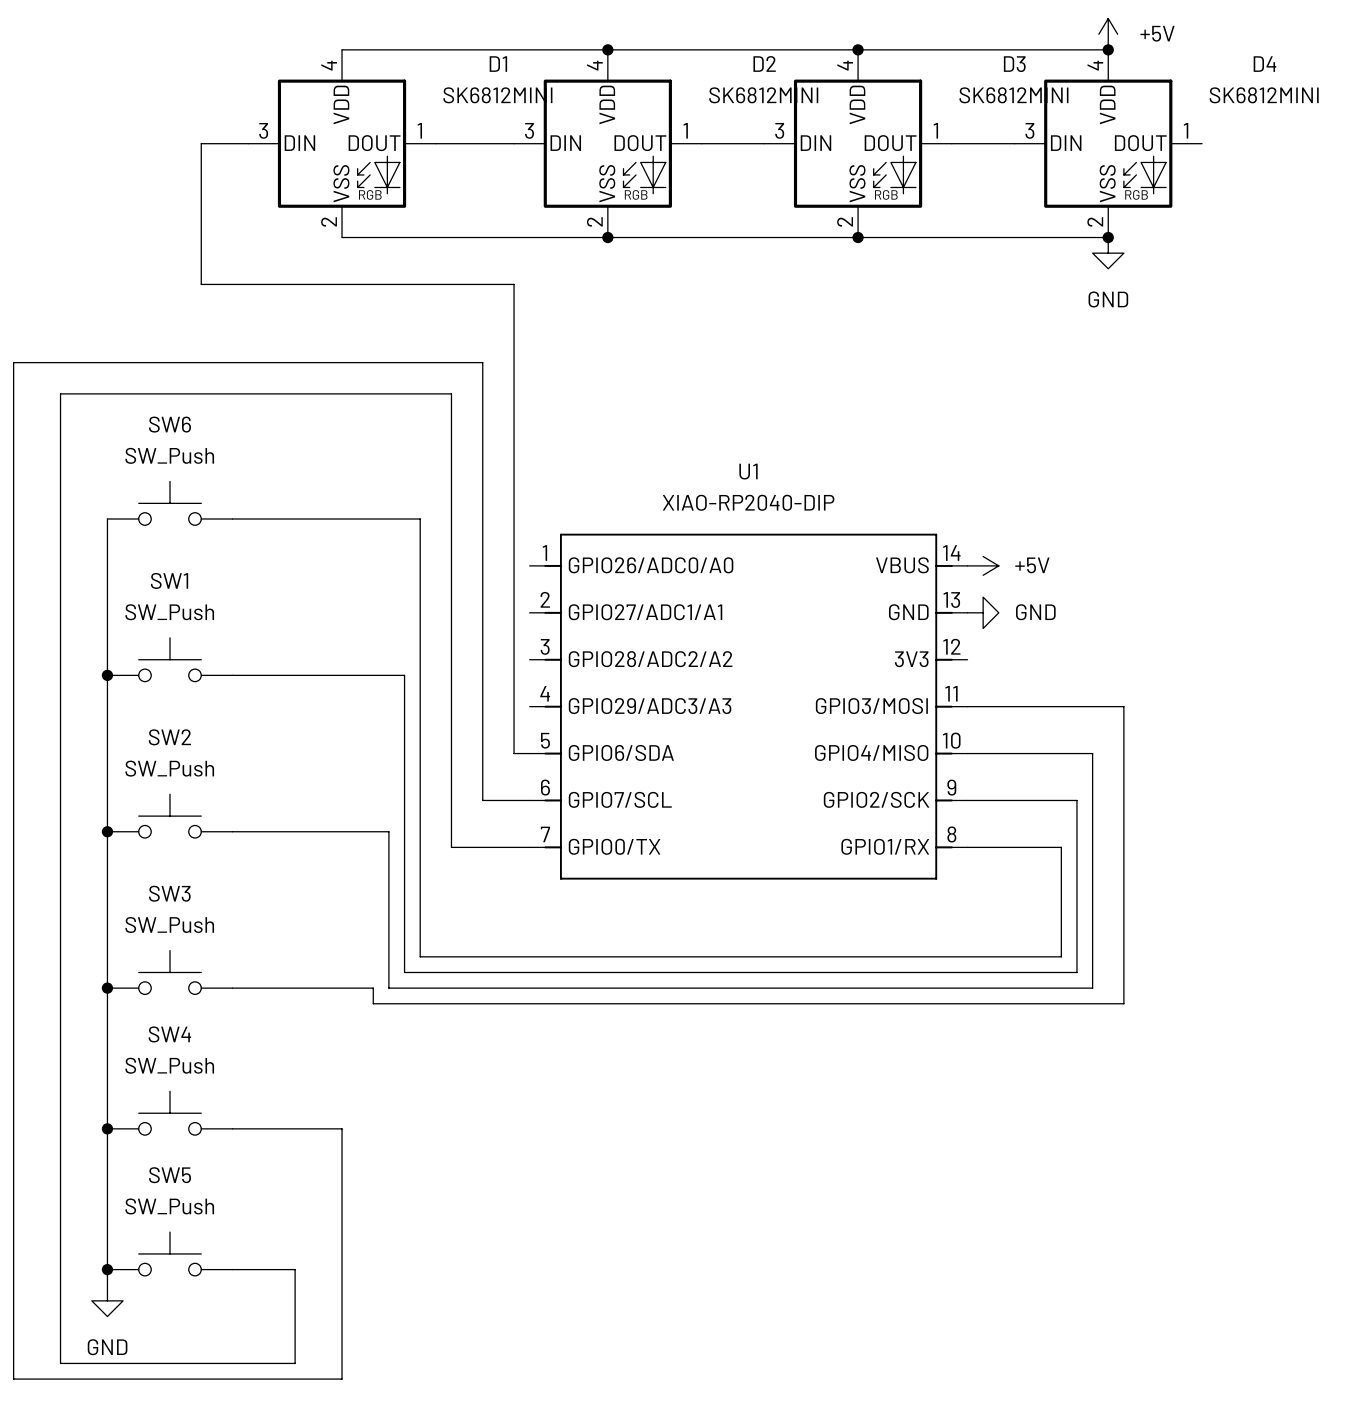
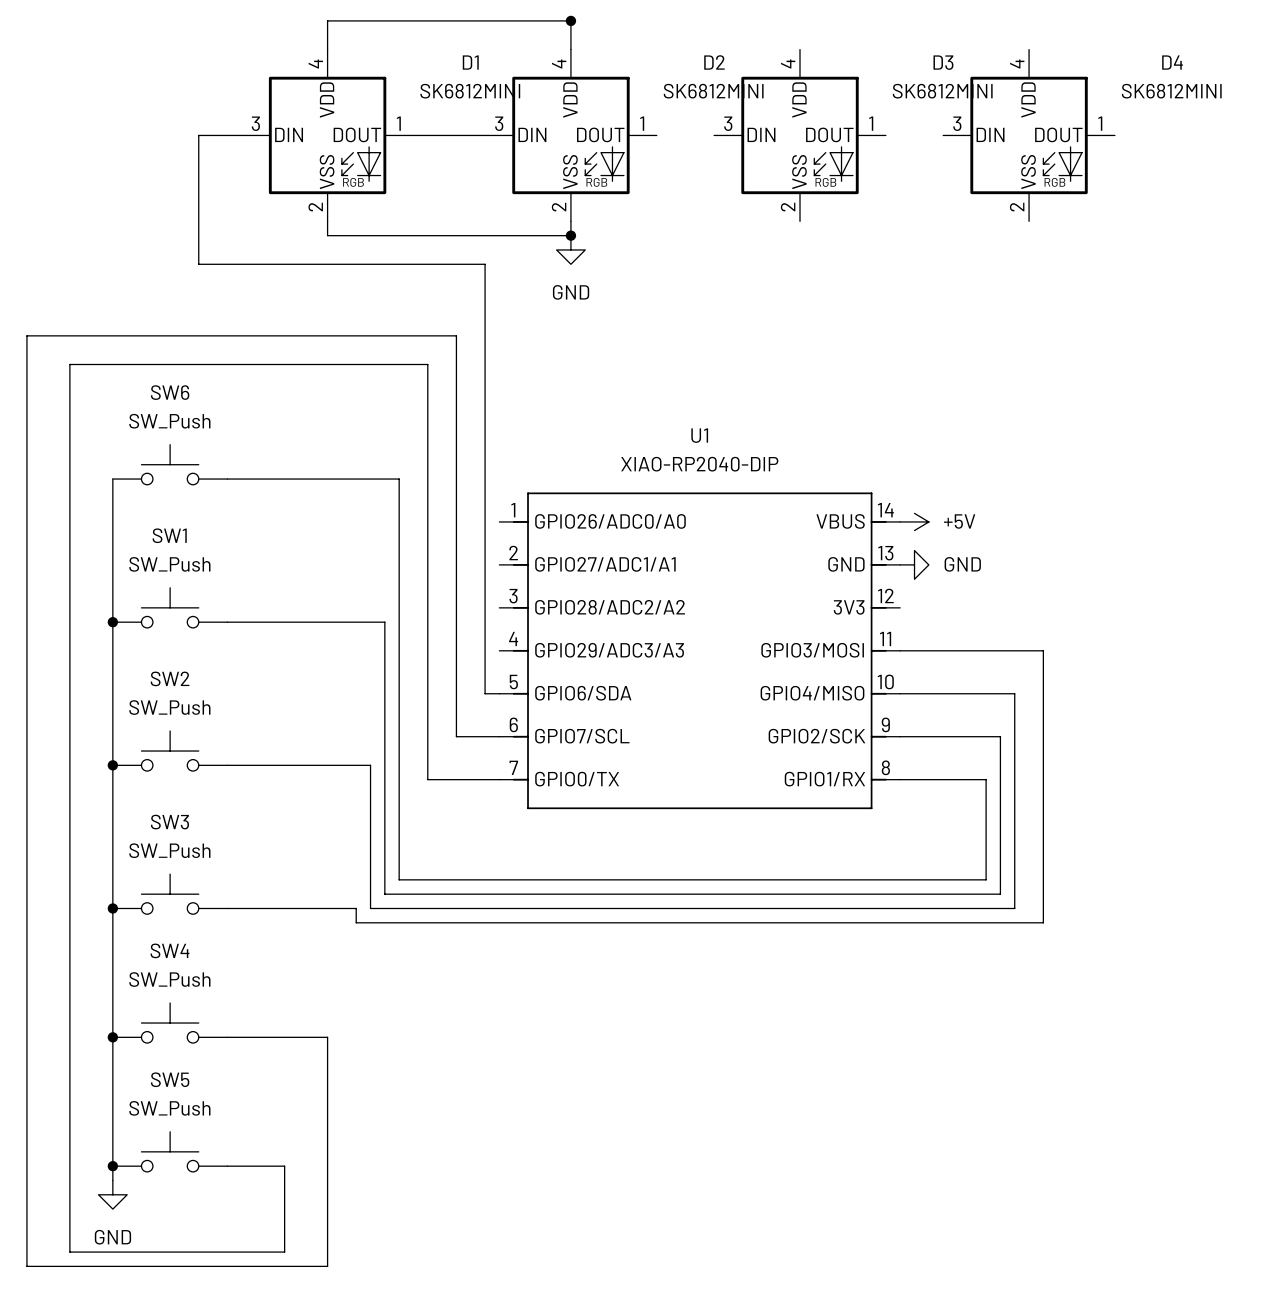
power symbol: +5V (1108, 34) -> none
wire: (342, 49) (1108, 49) -> (327, 49) (327, 20) (570, 20) (570, 49)
junction position: (607, 49) -> (570, 20)
junction: (858, 49) -> none
junction: (1108, 49) -> none
wire: (701, 143) (764, 143) -> none
wire: (951, 143) (1014, 143) -> none
wire: (342, 237) (1108, 237) -> (327, 221) (327, 235) (570, 235) (570, 221)
junction position: (607, 237) -> (570, 235)
junction: (858, 237) -> none
junction: (1108, 237) -> none
power symbol: GND (1108, 253) -> none
power symbol: none -> GND (570, 249)

